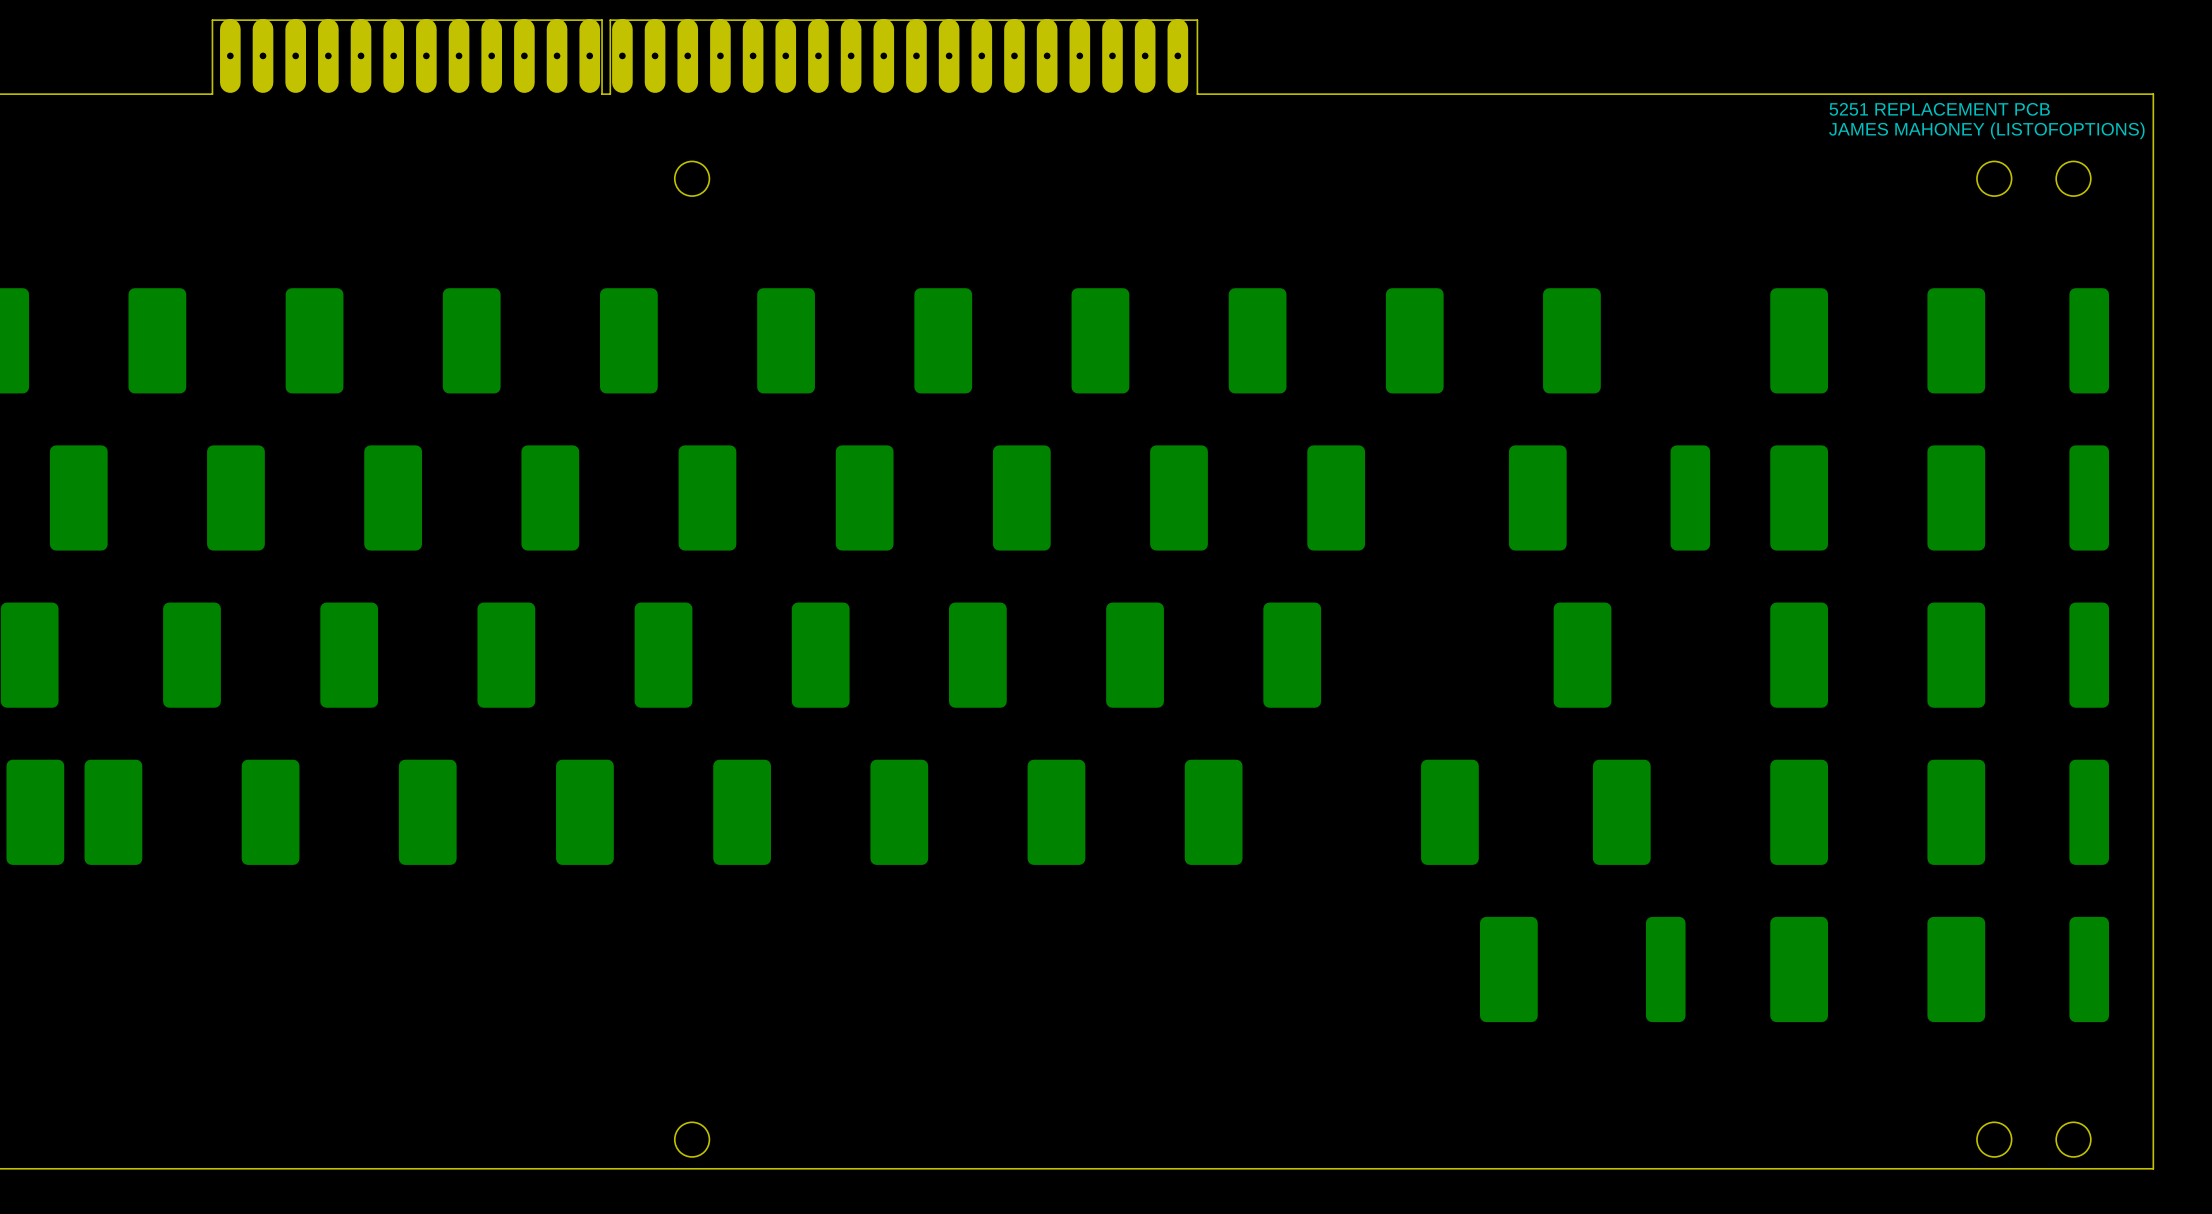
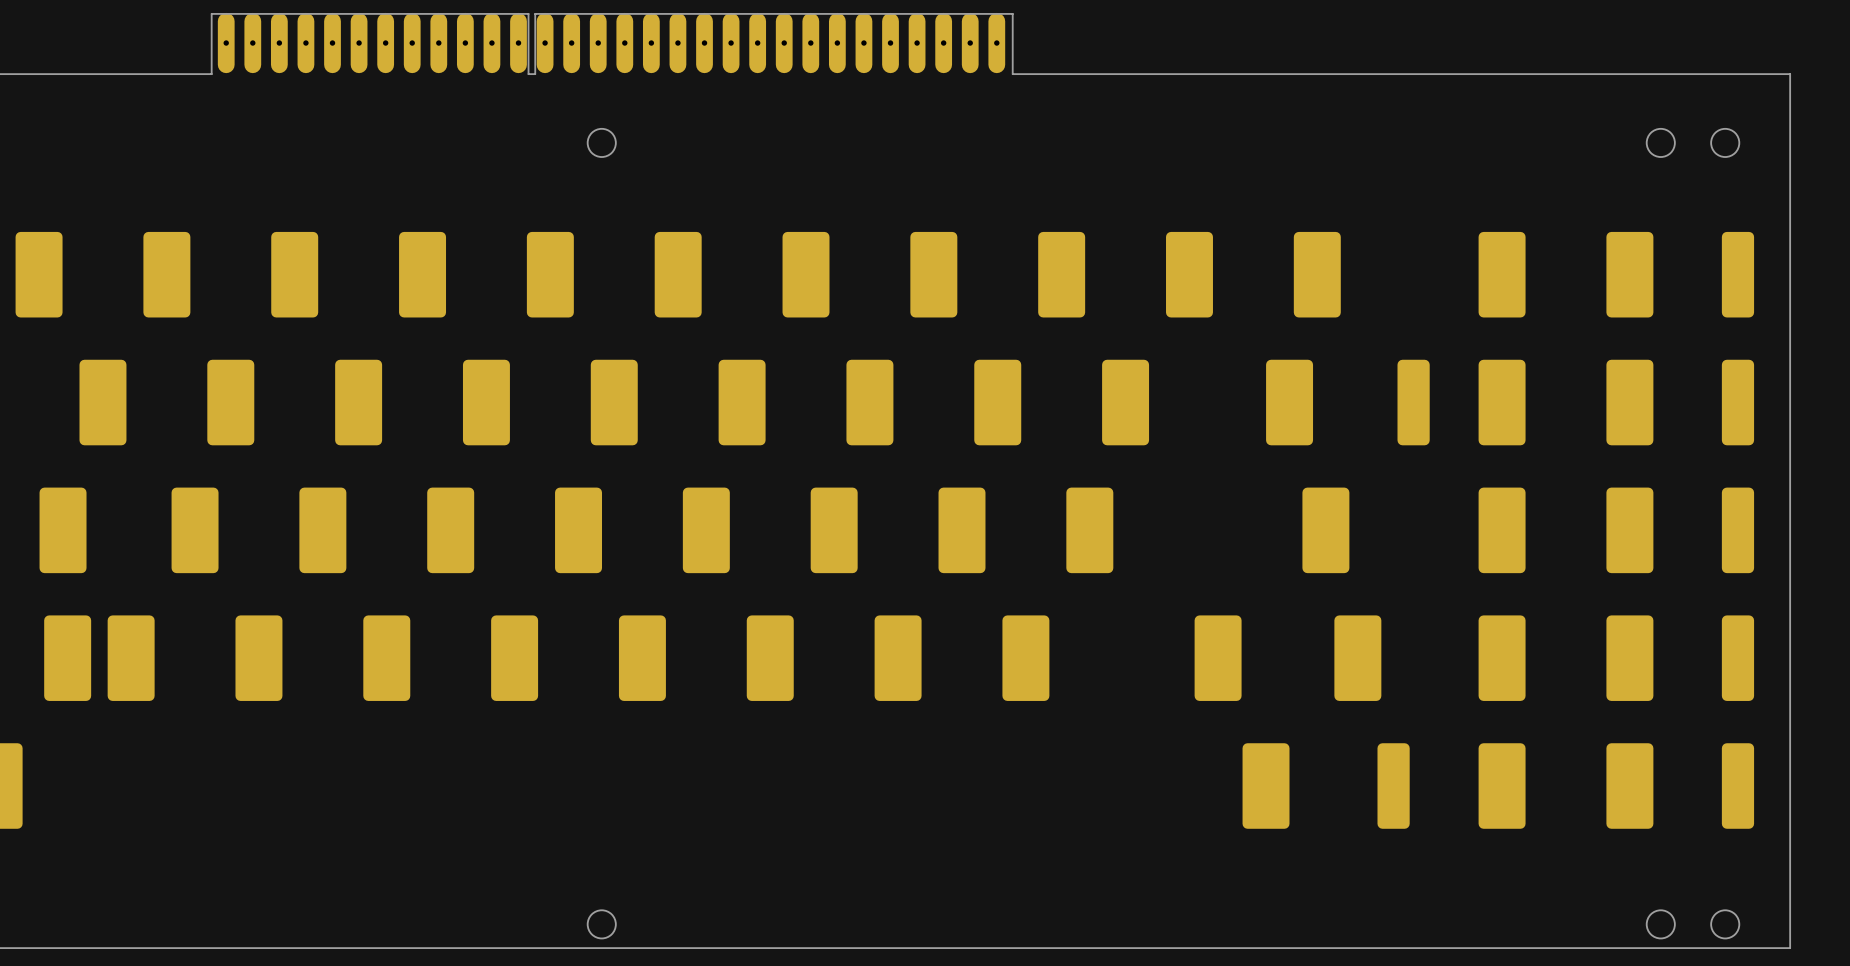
text: 5251 REPLACEMENT PCB (1939, 109) -> none
text: JAMES MAHONEY (LISTOFOPTIONS) (1986, 130) -> none

